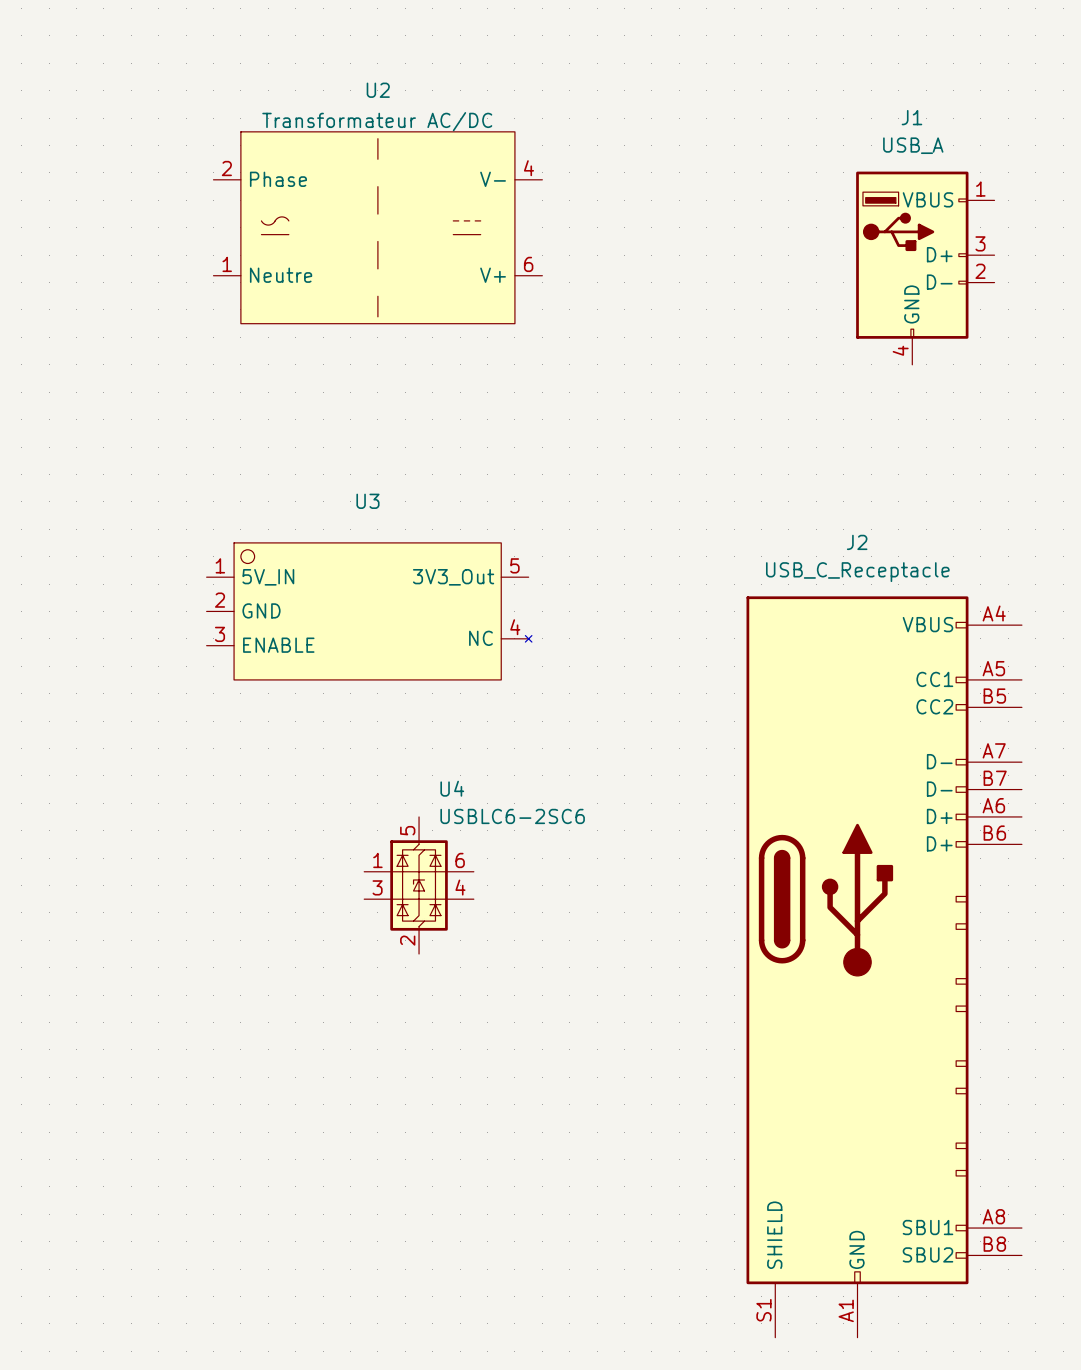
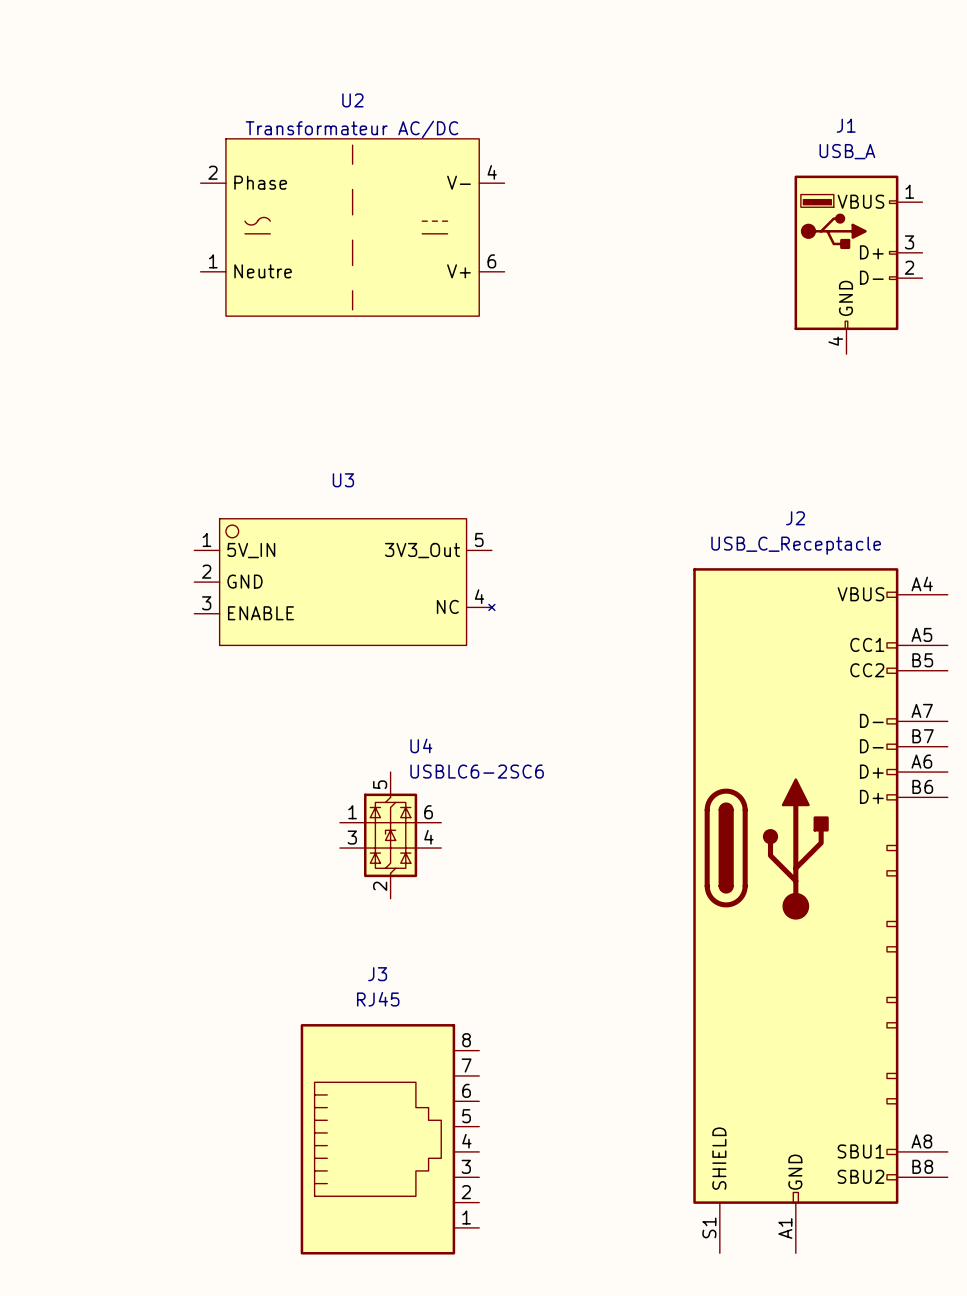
J3: none -> RJ45 (389, 1139)

